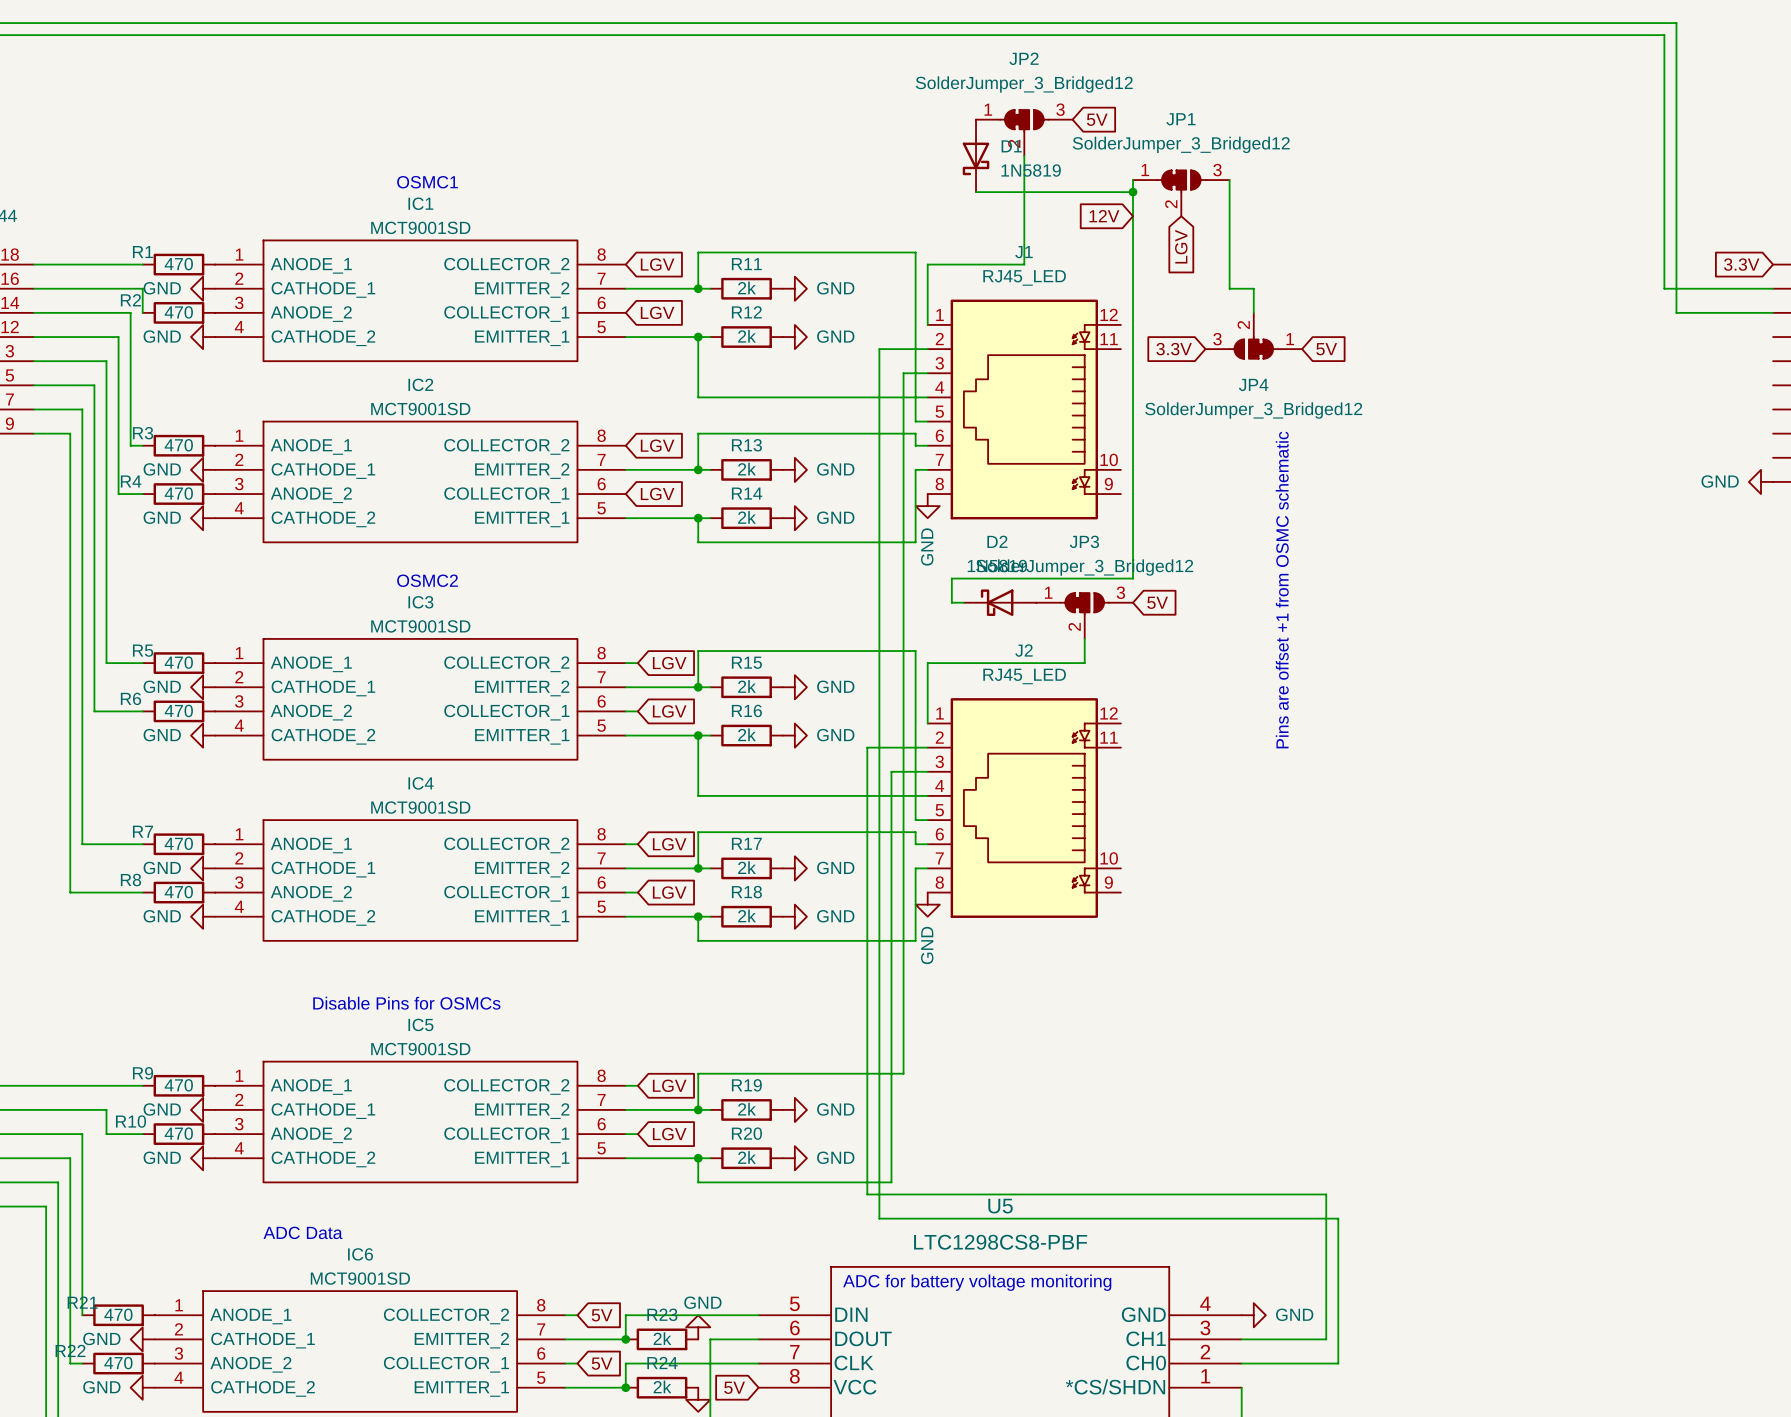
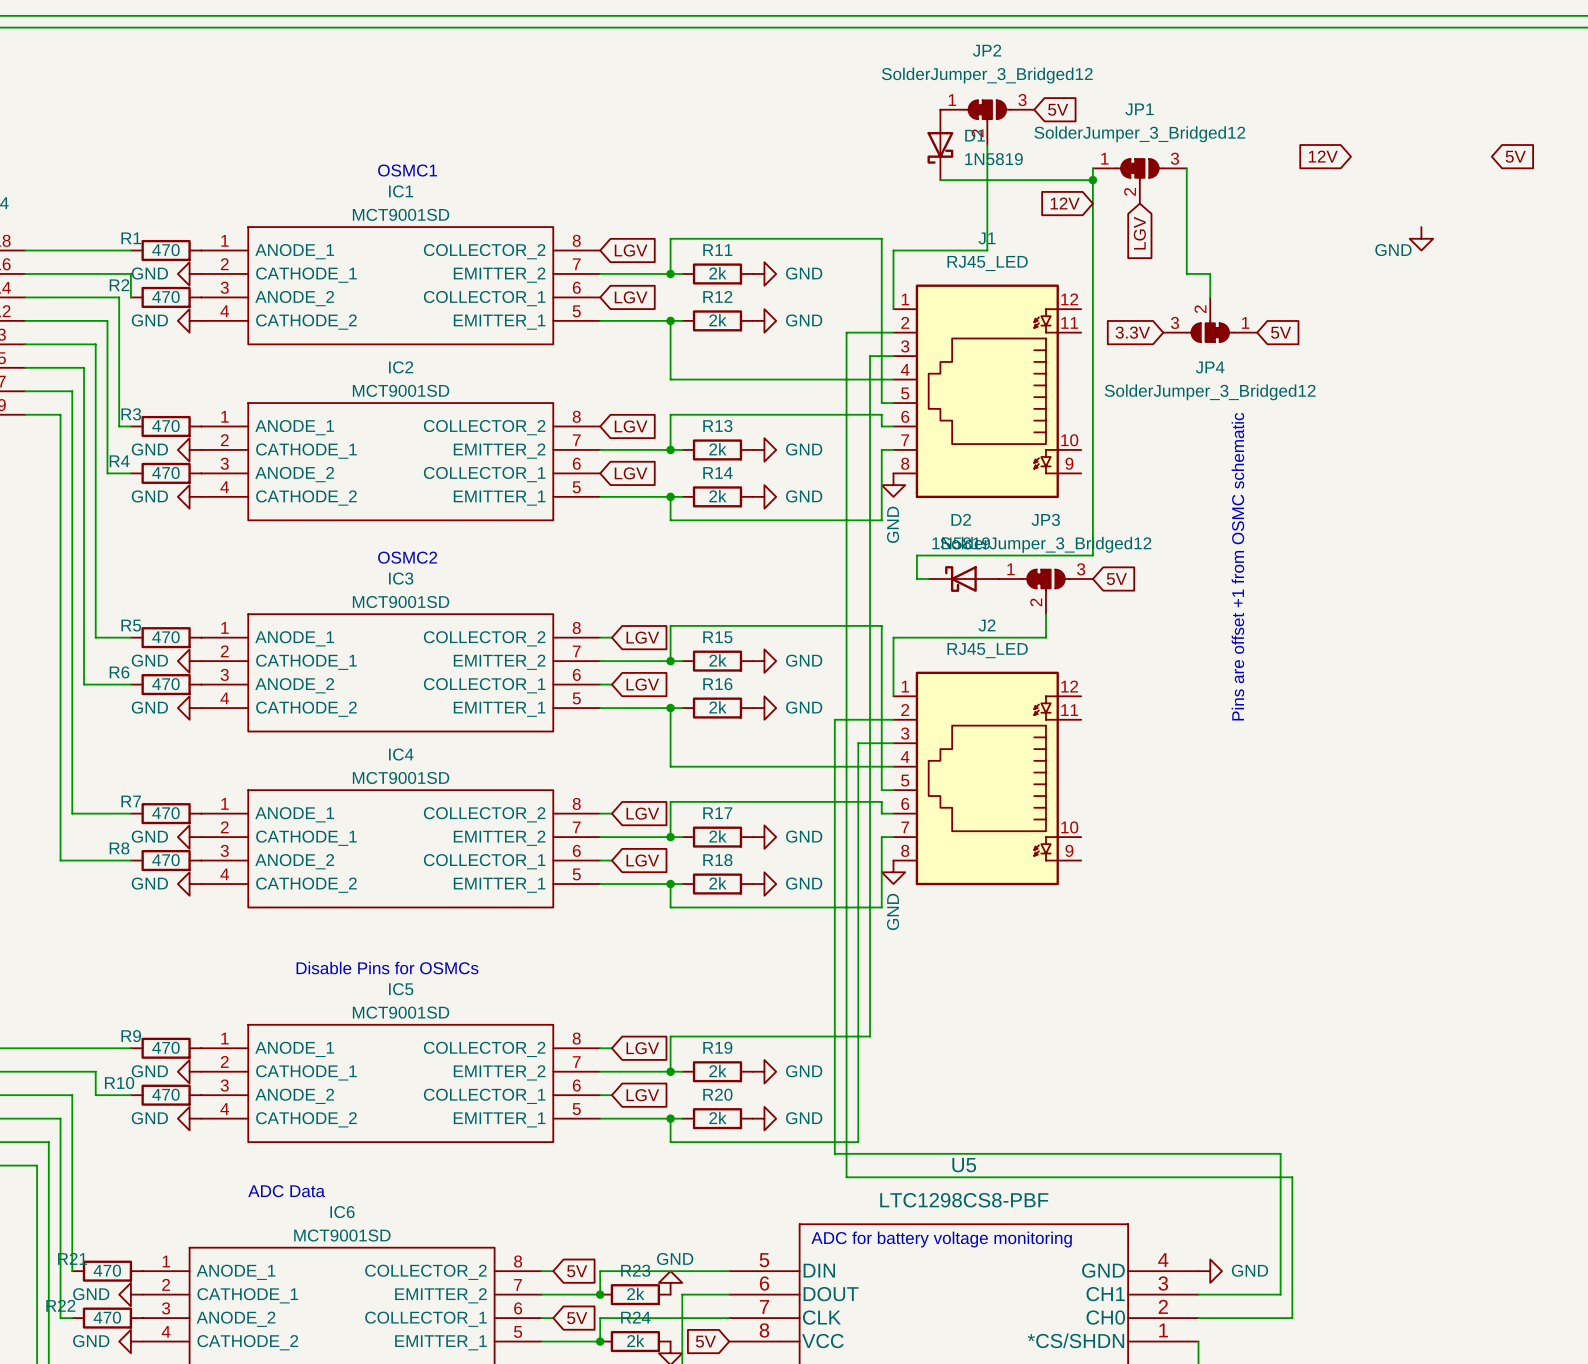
global label: none -> 12V (1323, 156)
global label: none -> 5V (1515, 156)
power symbol: none -> GND (1421, 238)

